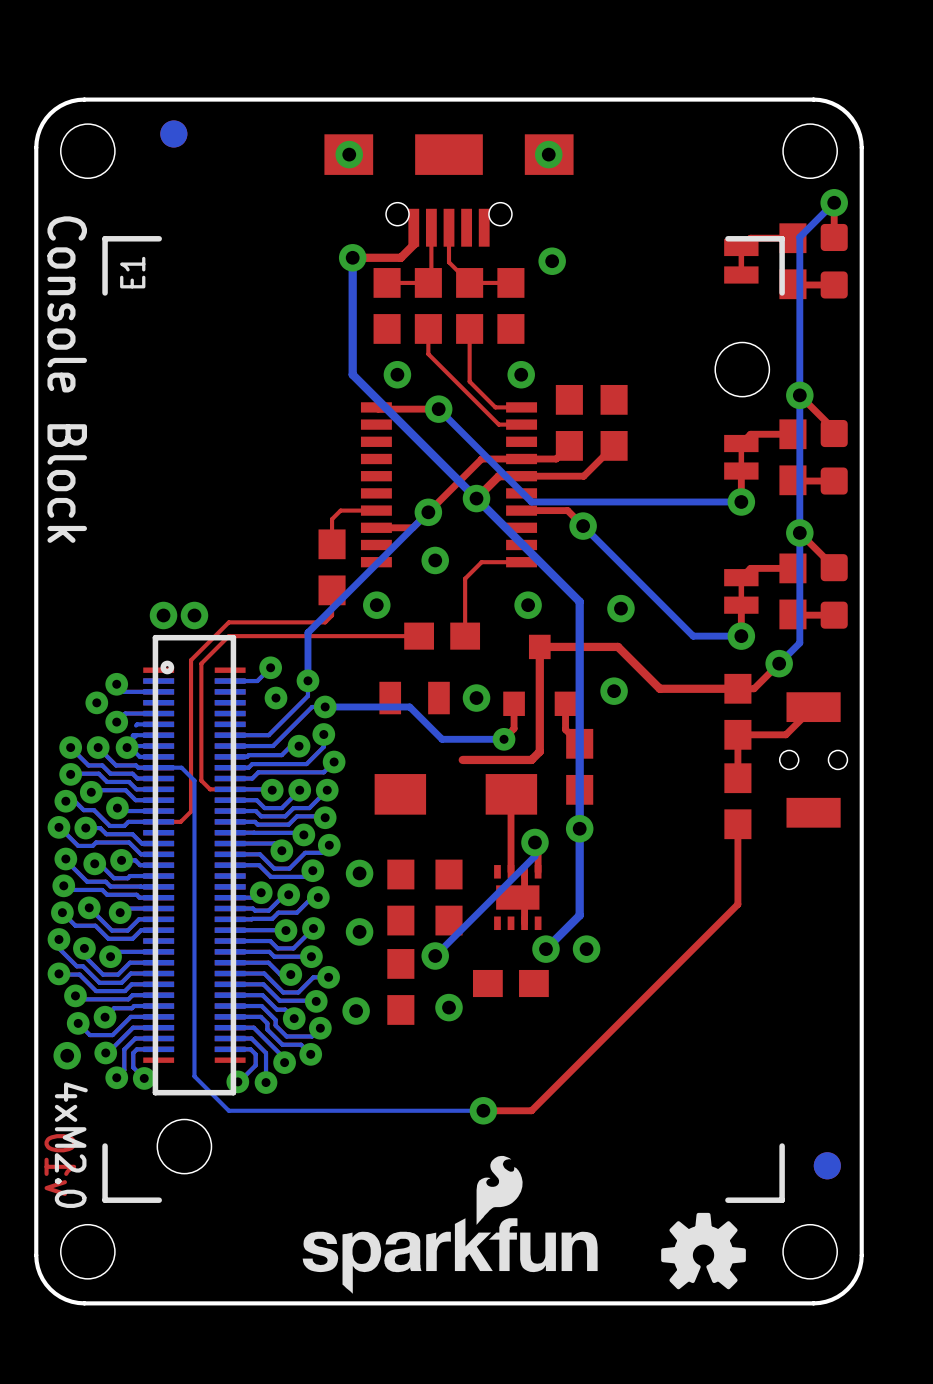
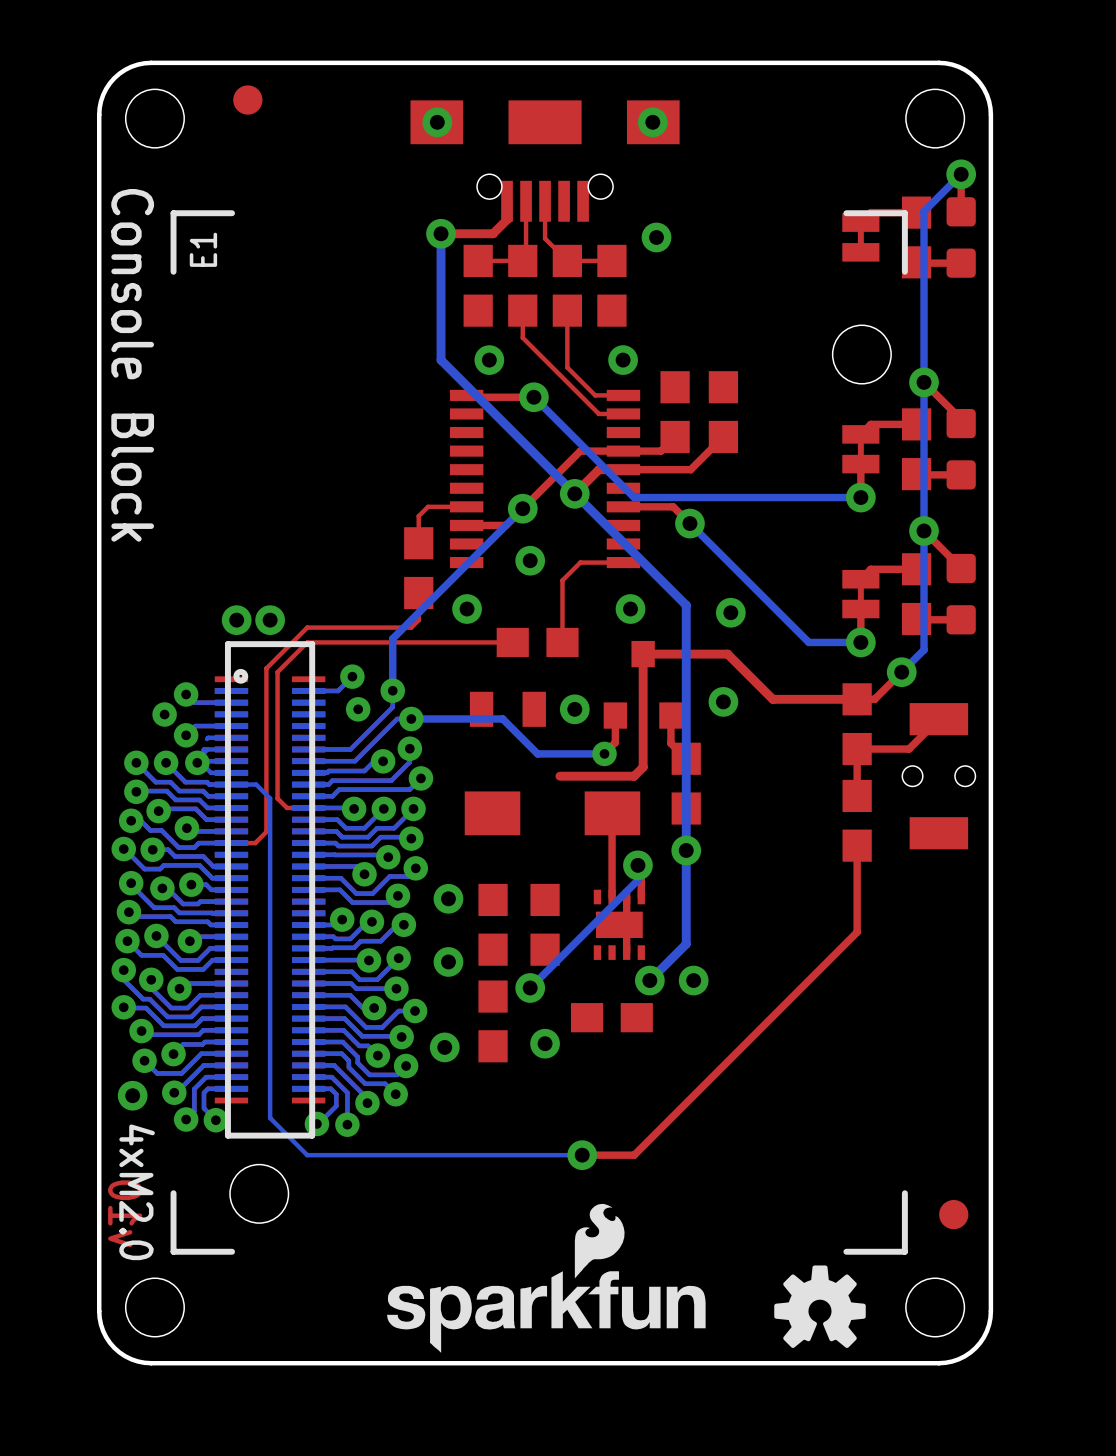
part: (173, 133) -> none
part: (827, 1165) -> none

